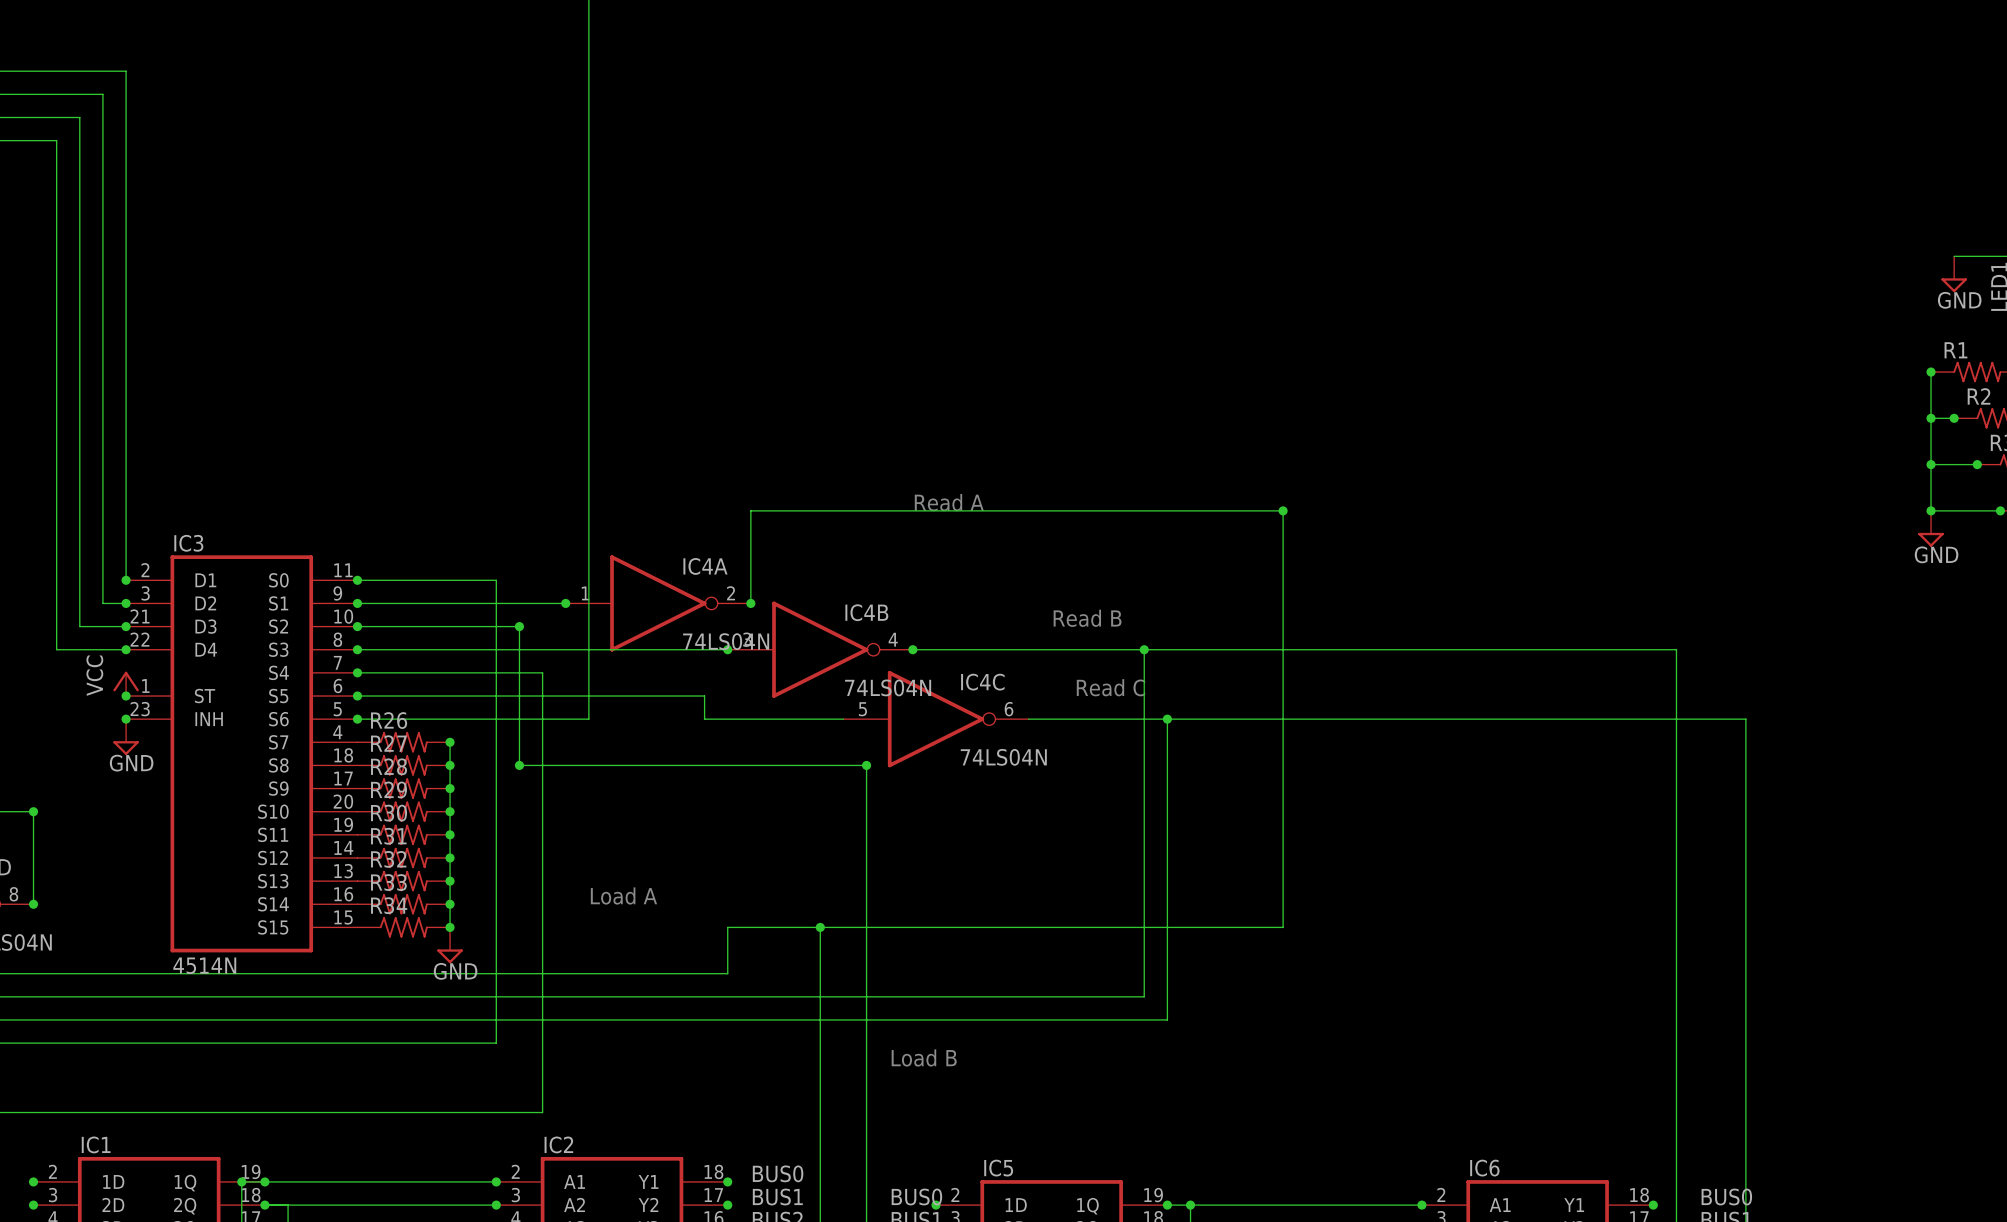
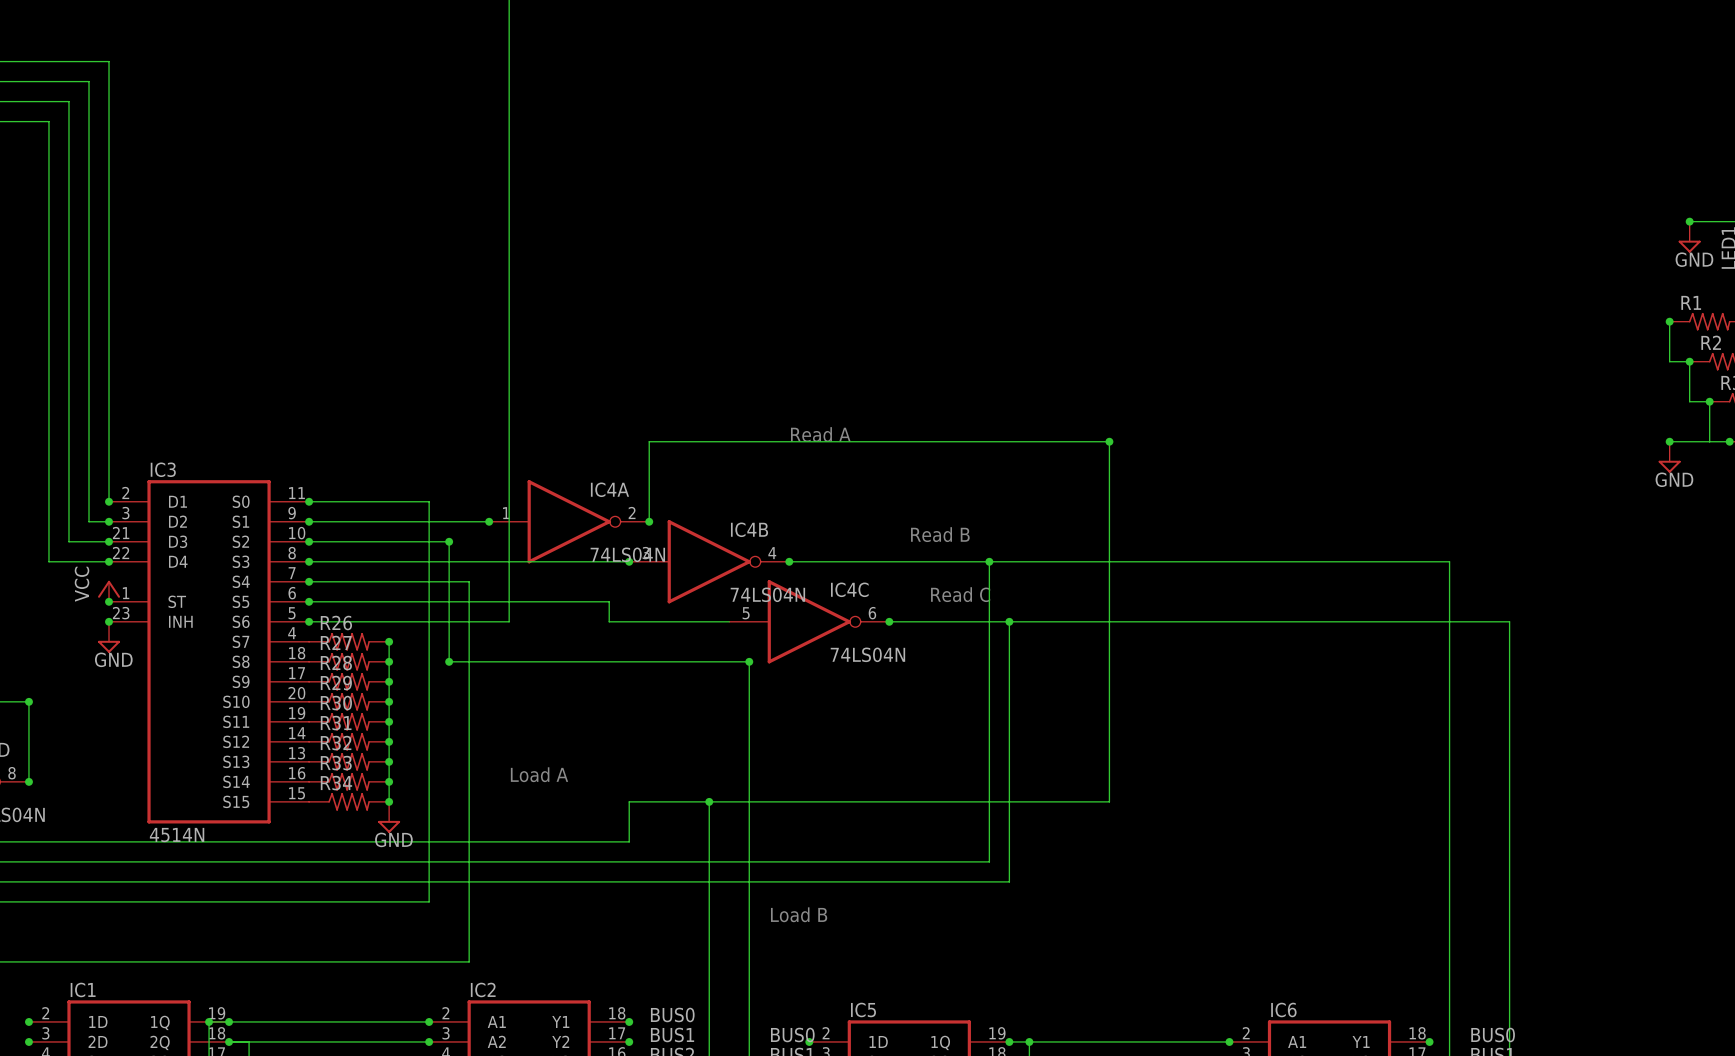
junction: none -> (1689, 221)
wire: (1931, 418) (1931, 510) -> none
junction: (1931, 418) -> none
wire: (1931, 464) (1954, 464) -> (1689, 361) (1689, 401)
junction: (1931, 464) -> none
wire: none -> (1709, 401) (1709, 441)
junction: none -> (889, 621)

